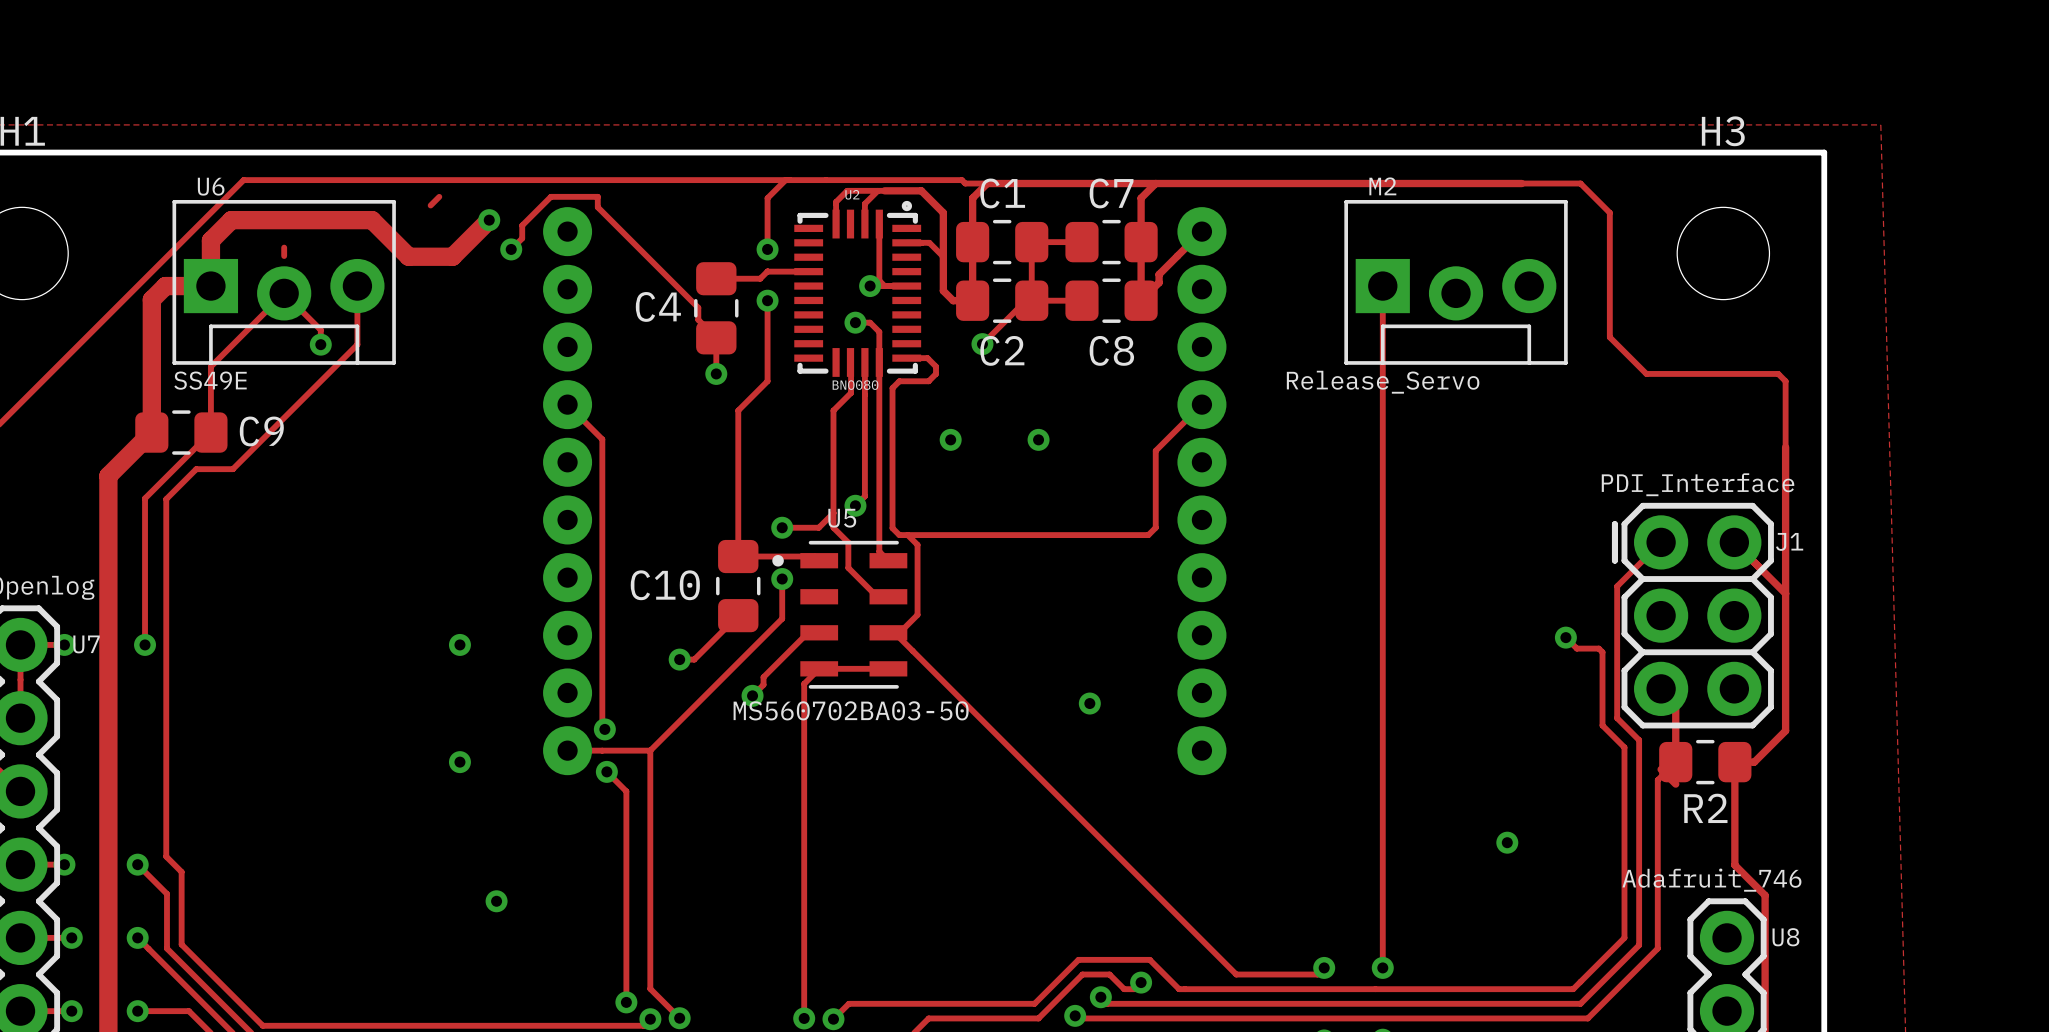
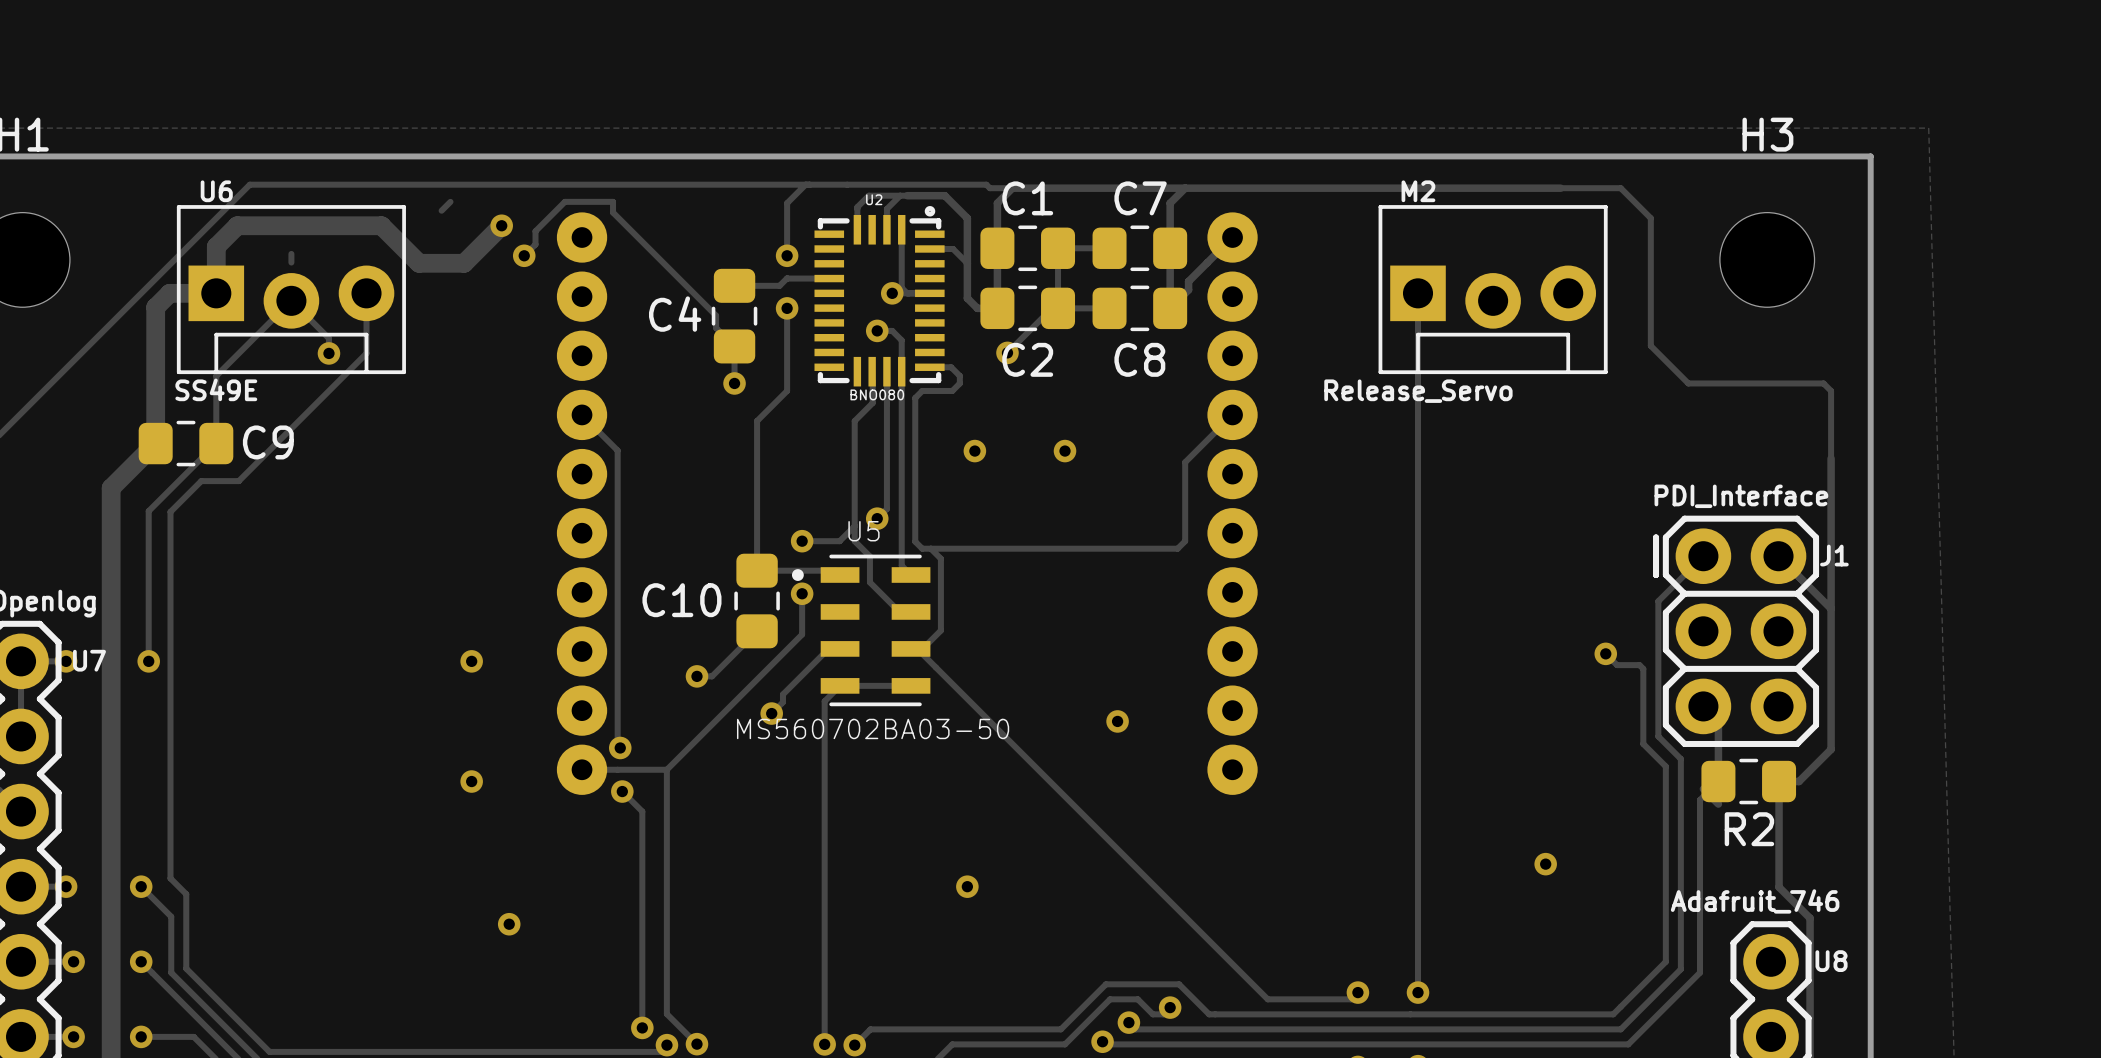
via: none -> (967, 886)

